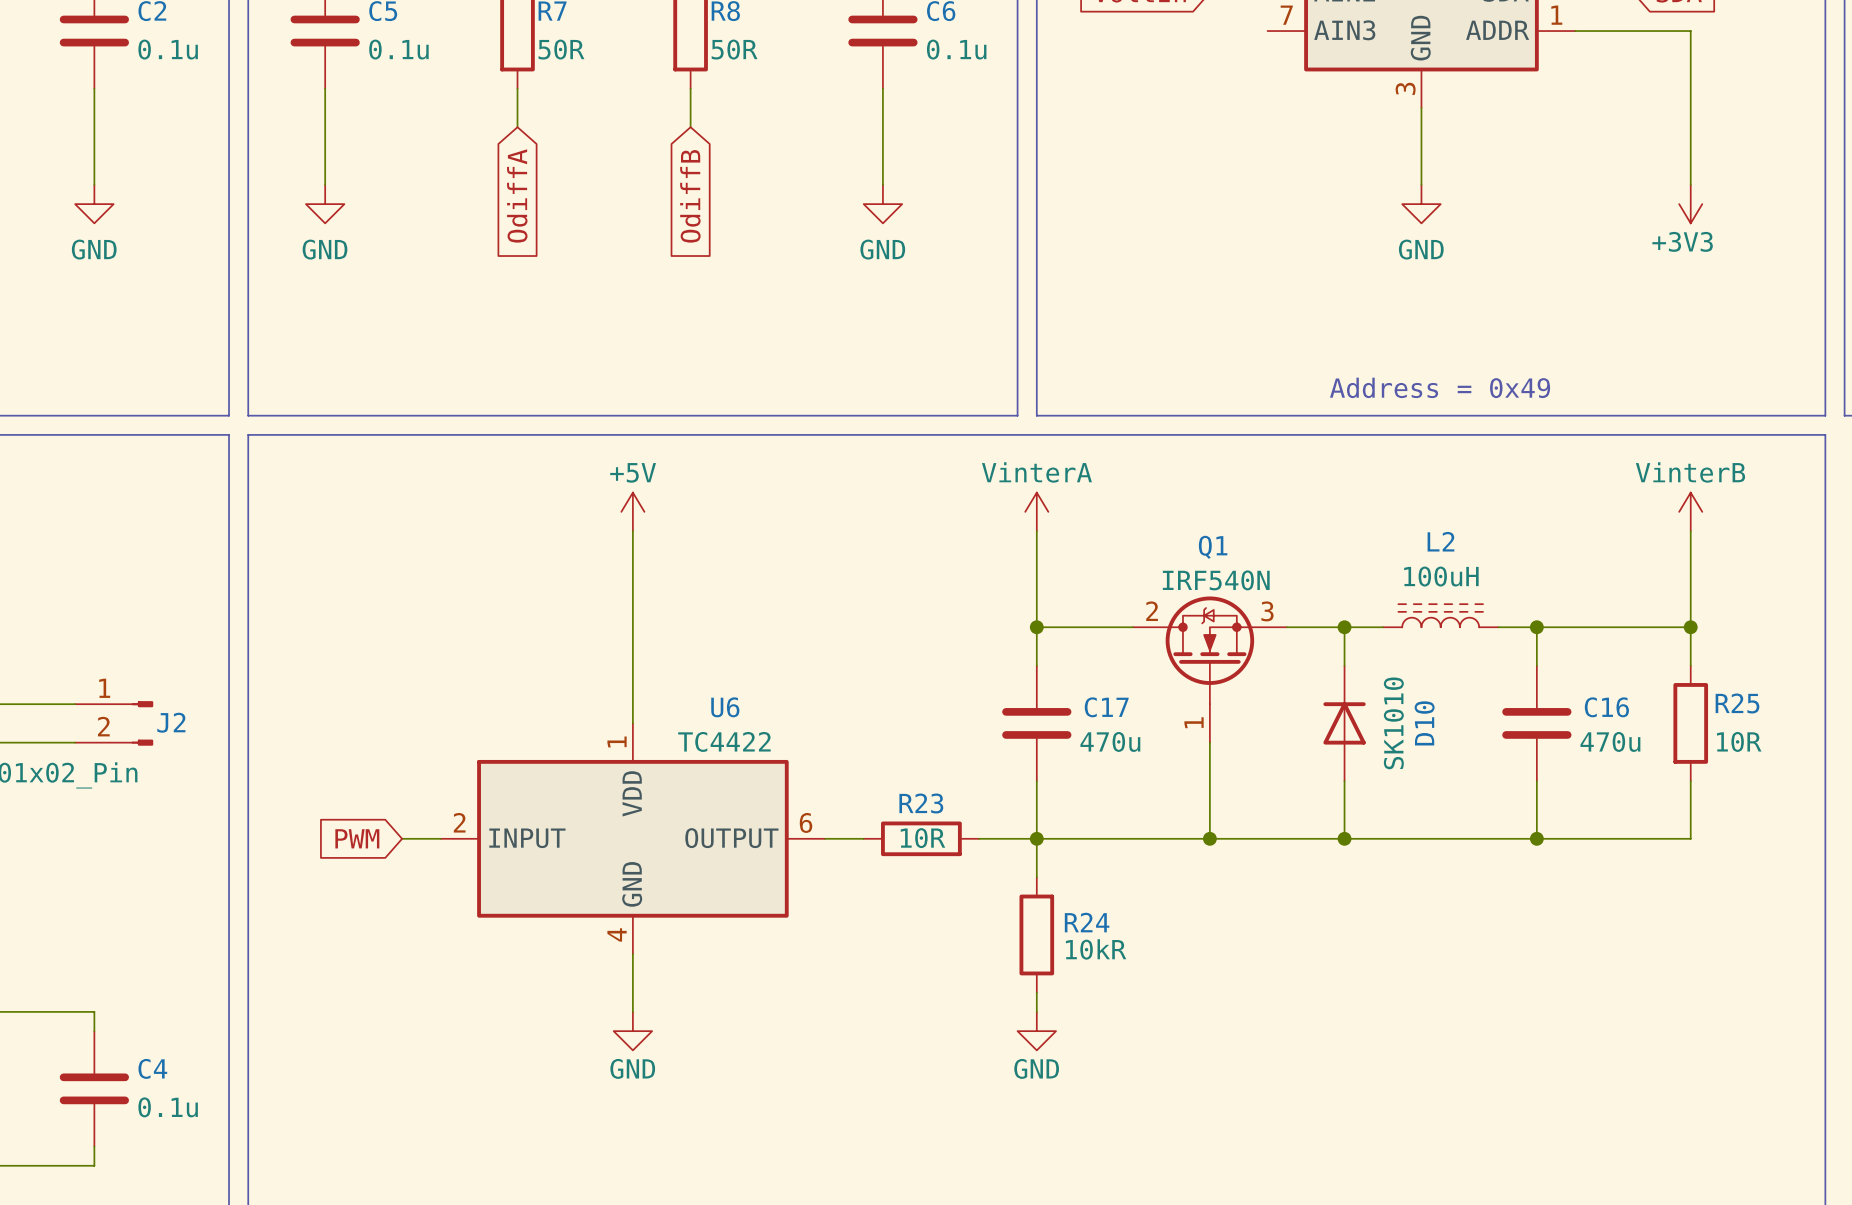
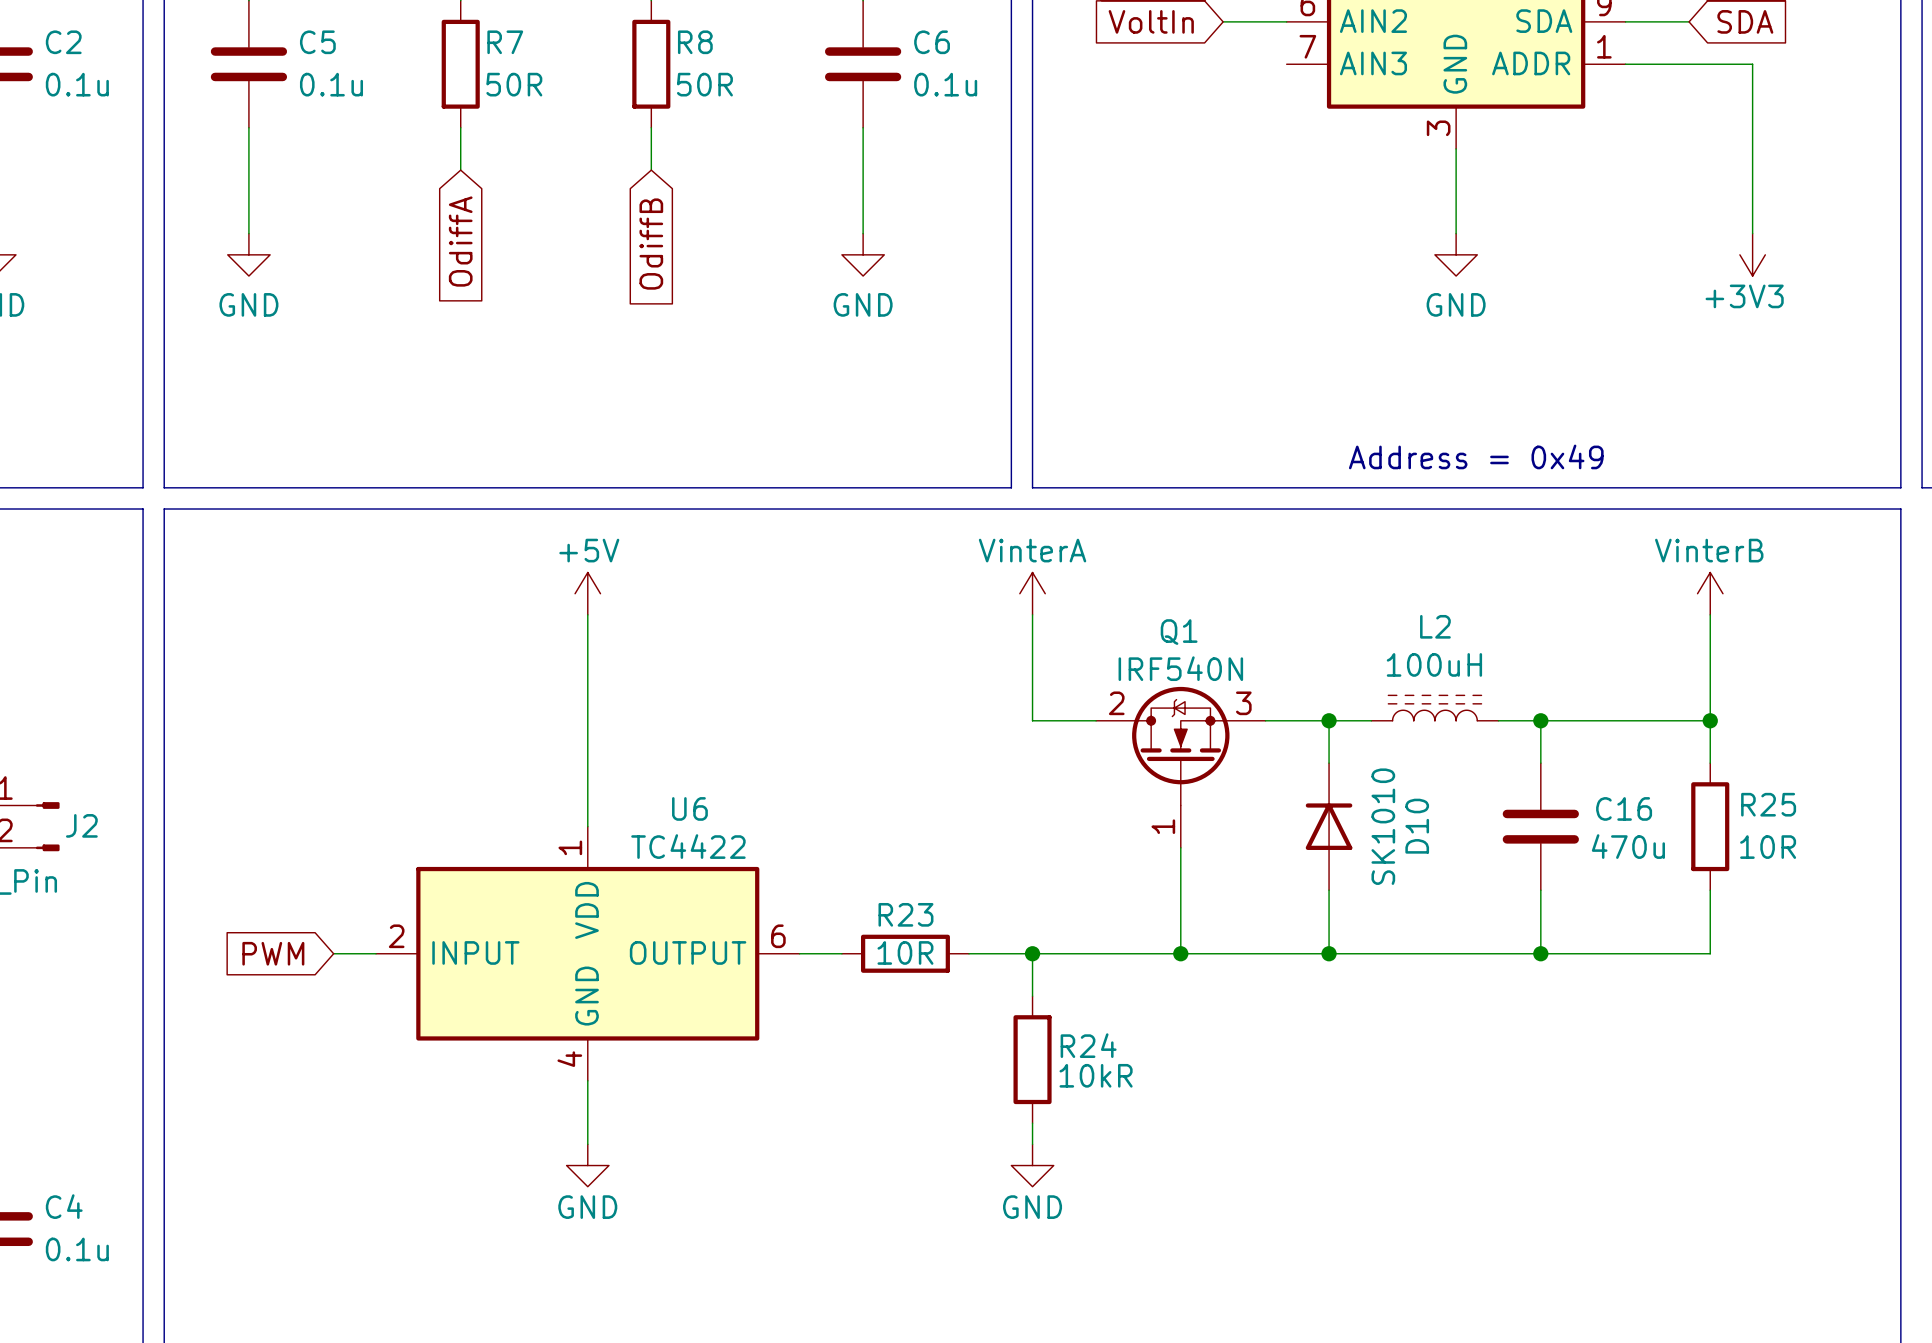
power symbol position: VinterB (1690, 511) -> VinterB (1710, 593)
wire: (1690, 531) (1690, 665) -> (1710, 614) (1710, 763)
L2 position: (1440, 615) -> (1434, 708)
wire: (1036, 627) (1036, 665) -> none
junction: (1036, 627) -> none
junction position: (1344, 627) -> (1329, 720)
wire: (1383, 627) (1344, 627) (1344, 665) -> none
wire: none -> (1498, 720) (1540, 720) (1540, 763)
wire: (1536, 627) (1536, 665) -> (1329, 720) (1329, 763)
junction position: (1536, 627) -> (1540, 720)
wire: (1652, 627) (1690, 627) -> none
junction position: (1690, 627) -> (1710, 720)
Q1 position: (1209, 669) -> (1180, 767)
C17: 470u (1036, 723) -> none
D10 position: (1344, 723) -> (1329, 826)
C16 position: (1536, 723) -> (1540, 826)
R25 position: (1690, 723) -> (1710, 826)
wire: (1209, 742) (1209, 838) -> (1180, 847) (1180, 953)
wire: (1036, 781) (1036, 838) -> none
wire: (1344, 781) (1344, 838) -> (1329, 890) (1329, 953)
wire: (1536, 781) (1536, 838) -> (1540, 890) (1540, 953)
wire: (1690, 781) (1690, 838) (1652, 838) -> (1710, 890) (1710, 953)
junction position: (1209, 838) -> (1180, 953)
junction position: (1344, 838) -> (1329, 953)
junction position: (1536, 838) -> (1540, 953)

